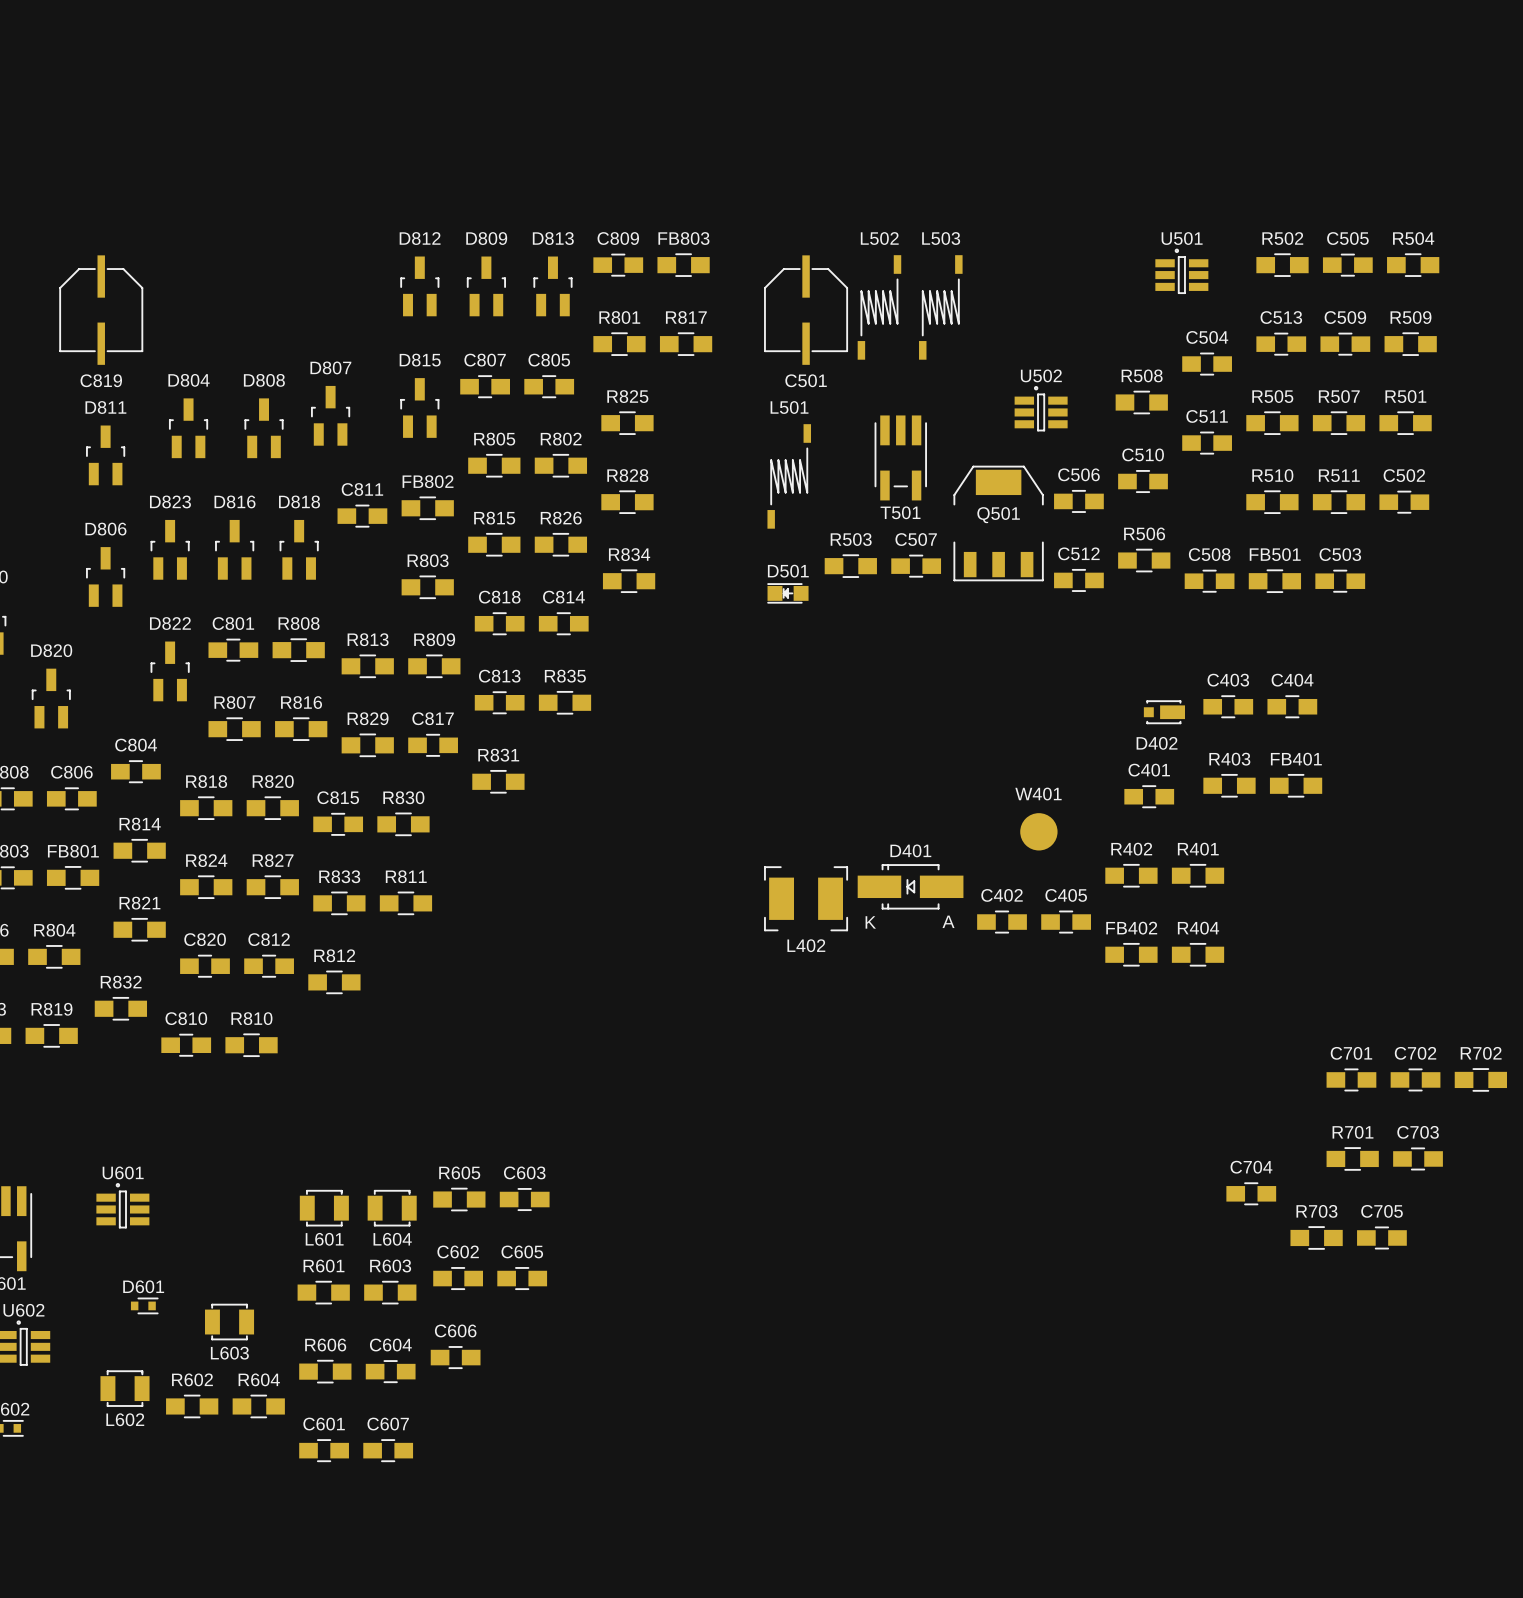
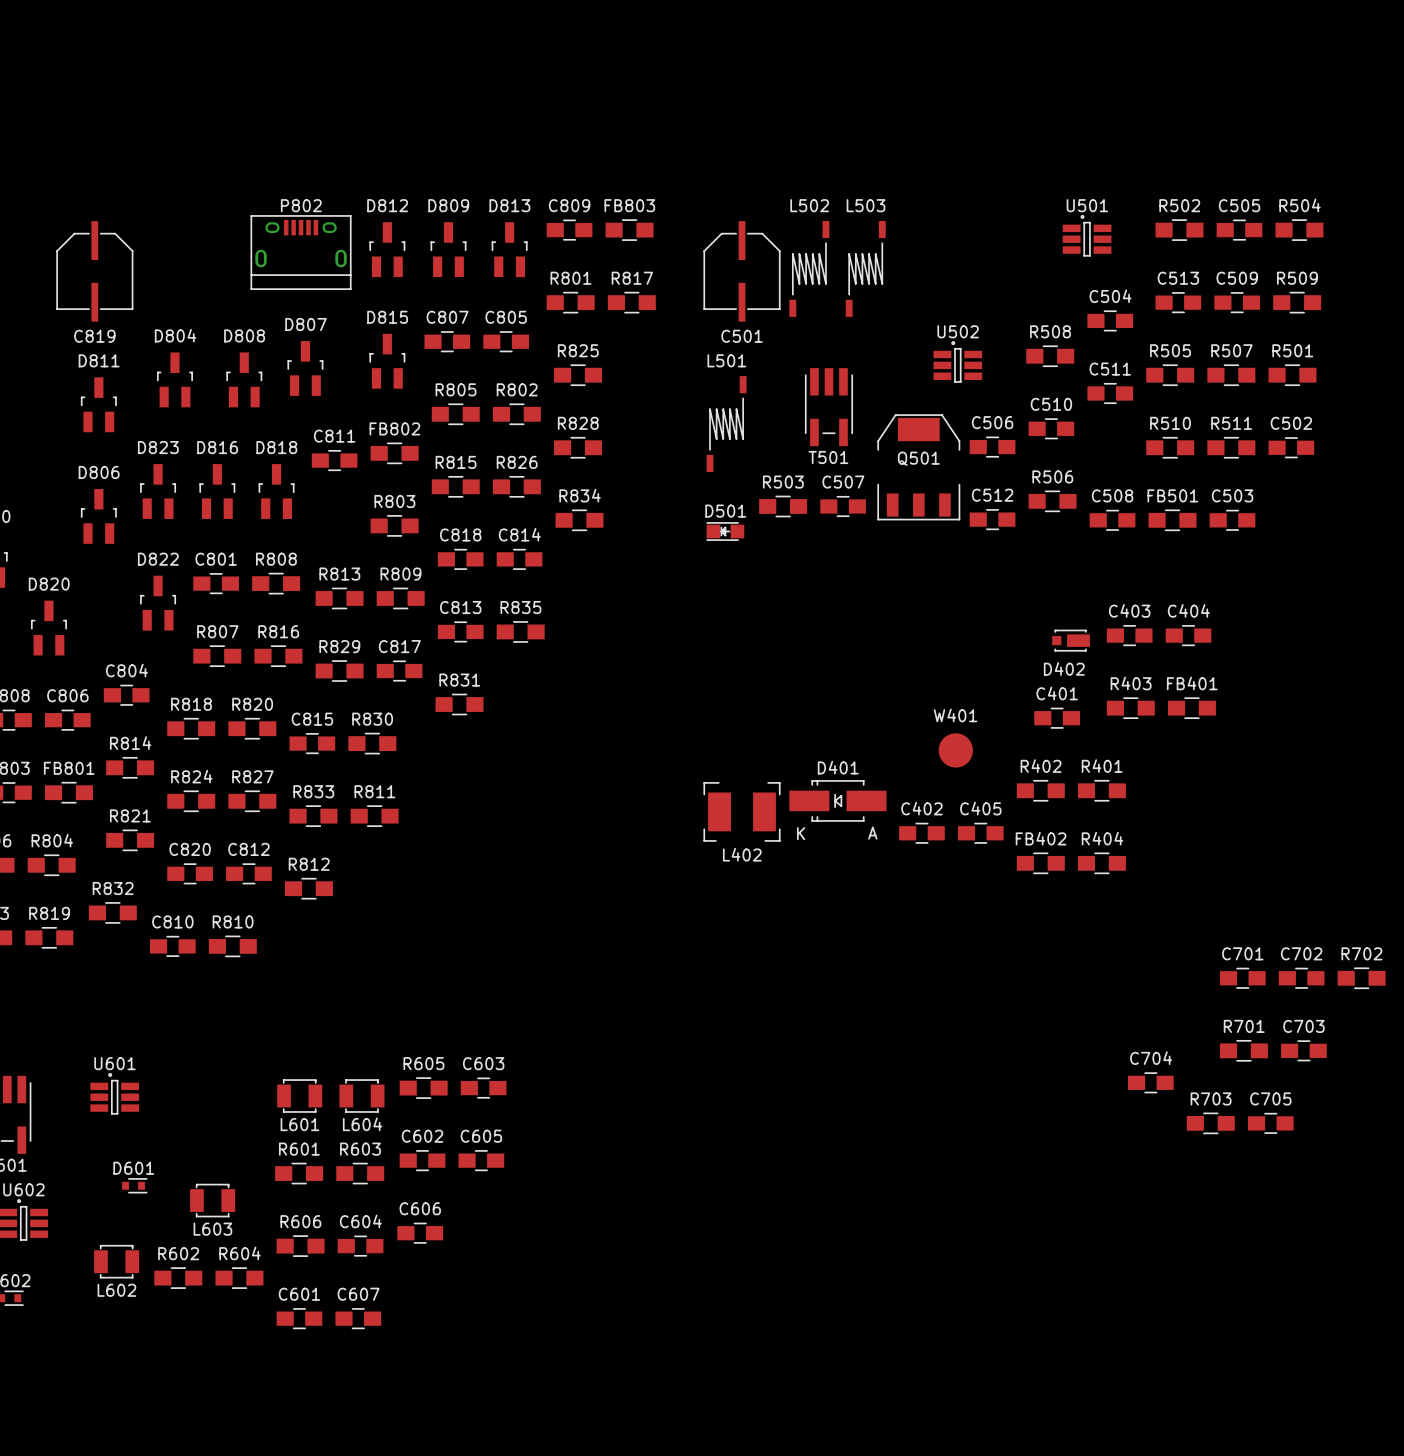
P802: none -> (301, 252)

